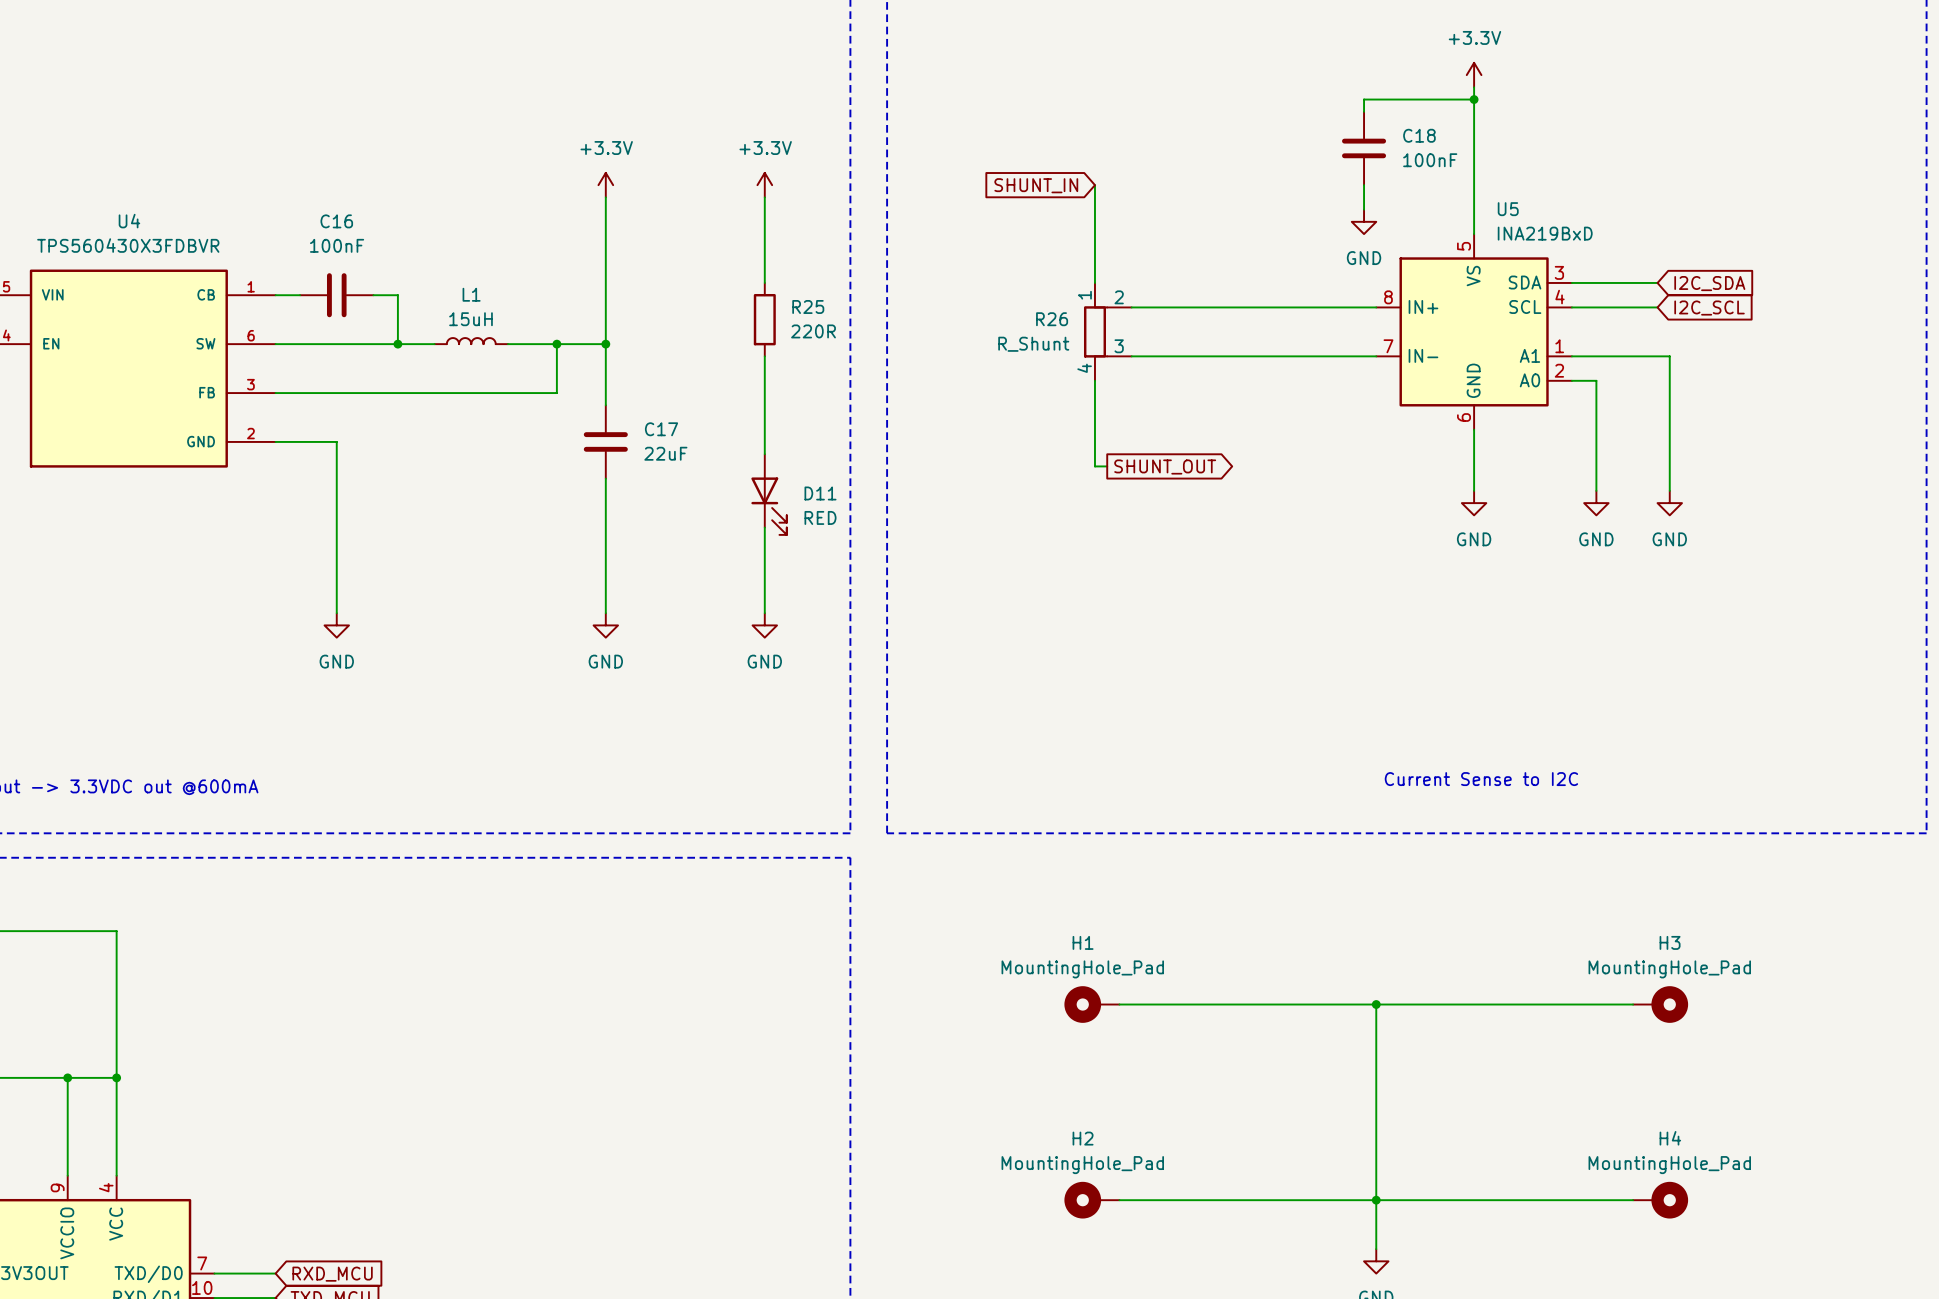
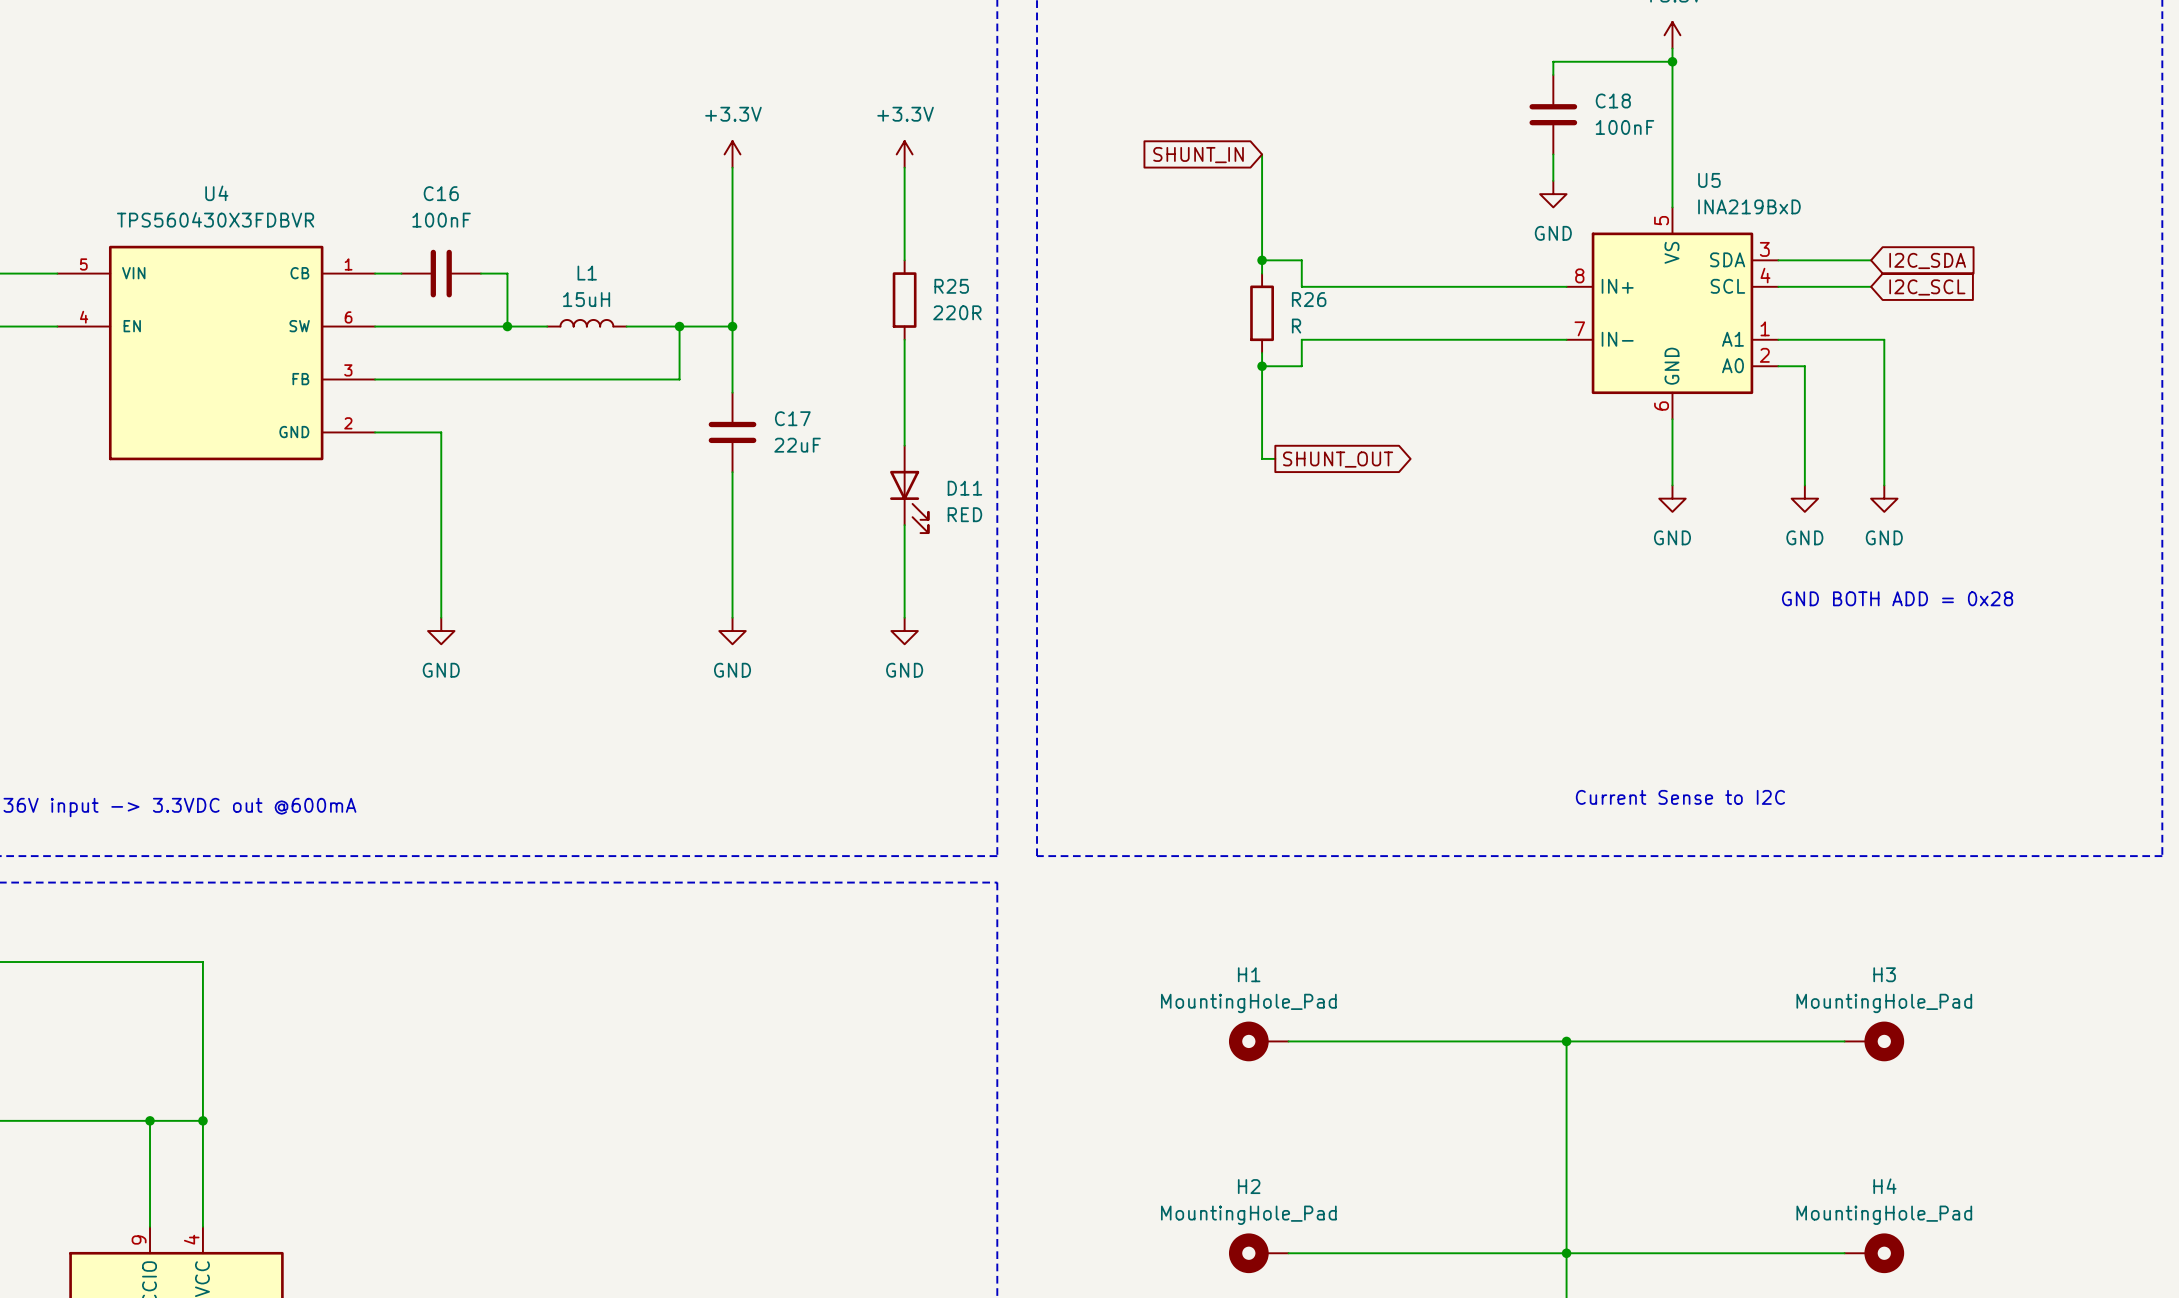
R26 symbol: [1083, 282, 1132, 381] -> [1250, 273, 1274, 354]
junction: none -> (1262, 260)
wire: none -> (1262, 273) (1262, 260) (1301, 260) (1301, 286)
R26 name position: R26 (1052, 319) -> R26 (1309, 299)
R26 value: R_Shunt (1033, 344) -> R (1296, 326)
wire: none -> (1301, 339) (1301, 366) (1262, 366) (1262, 353)
junction: none -> (1262, 366)
text: none -> GND BOTH ADD = 0x28 (1897, 598)

